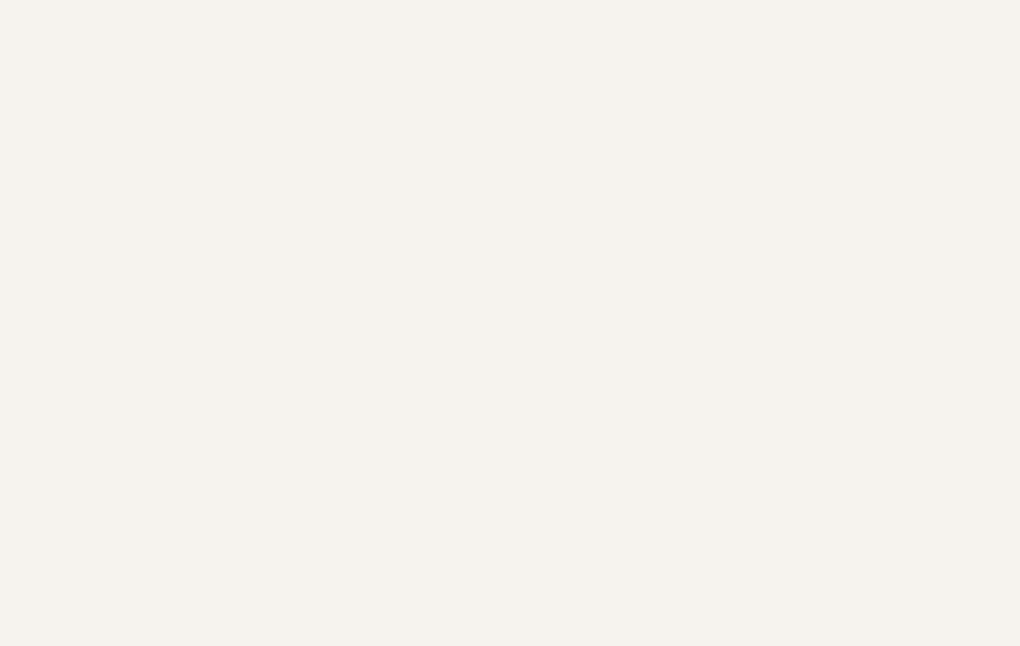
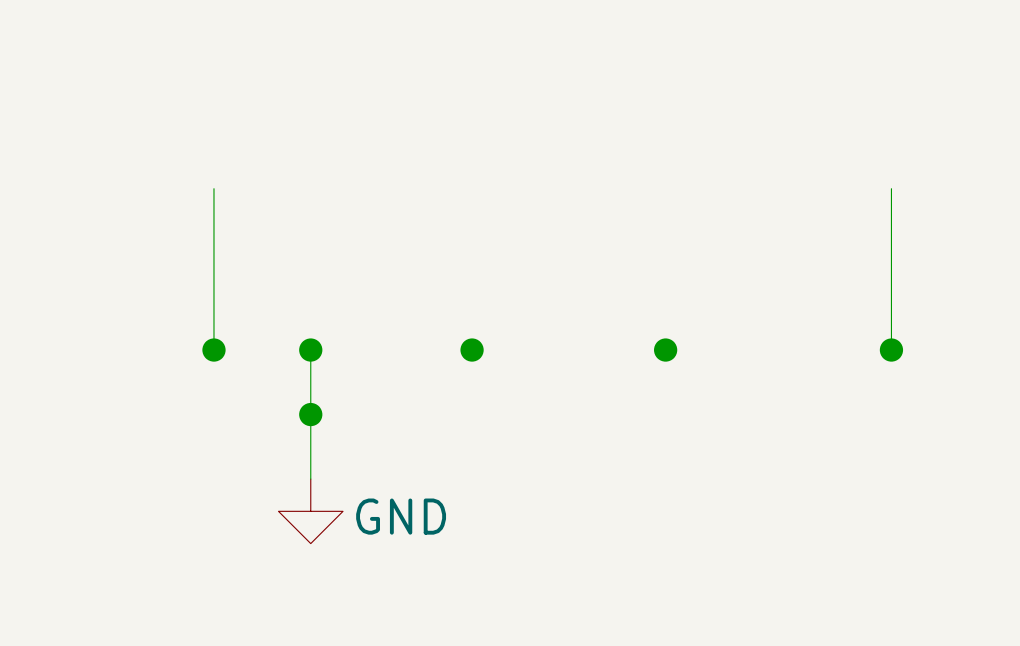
wire: none -> (213, 188) (213, 350)
wire: none -> (891, 188) (891, 350)
junction: none -> (213, 350)
wire: none -> (310, 350) (310, 479)
junction: none -> (310, 350)
junction: none -> (472, 350)
junction: none -> (665, 350)
junction: none -> (891, 350)
junction: none -> (310, 414)
power symbol: none -> GND (310, 511)

